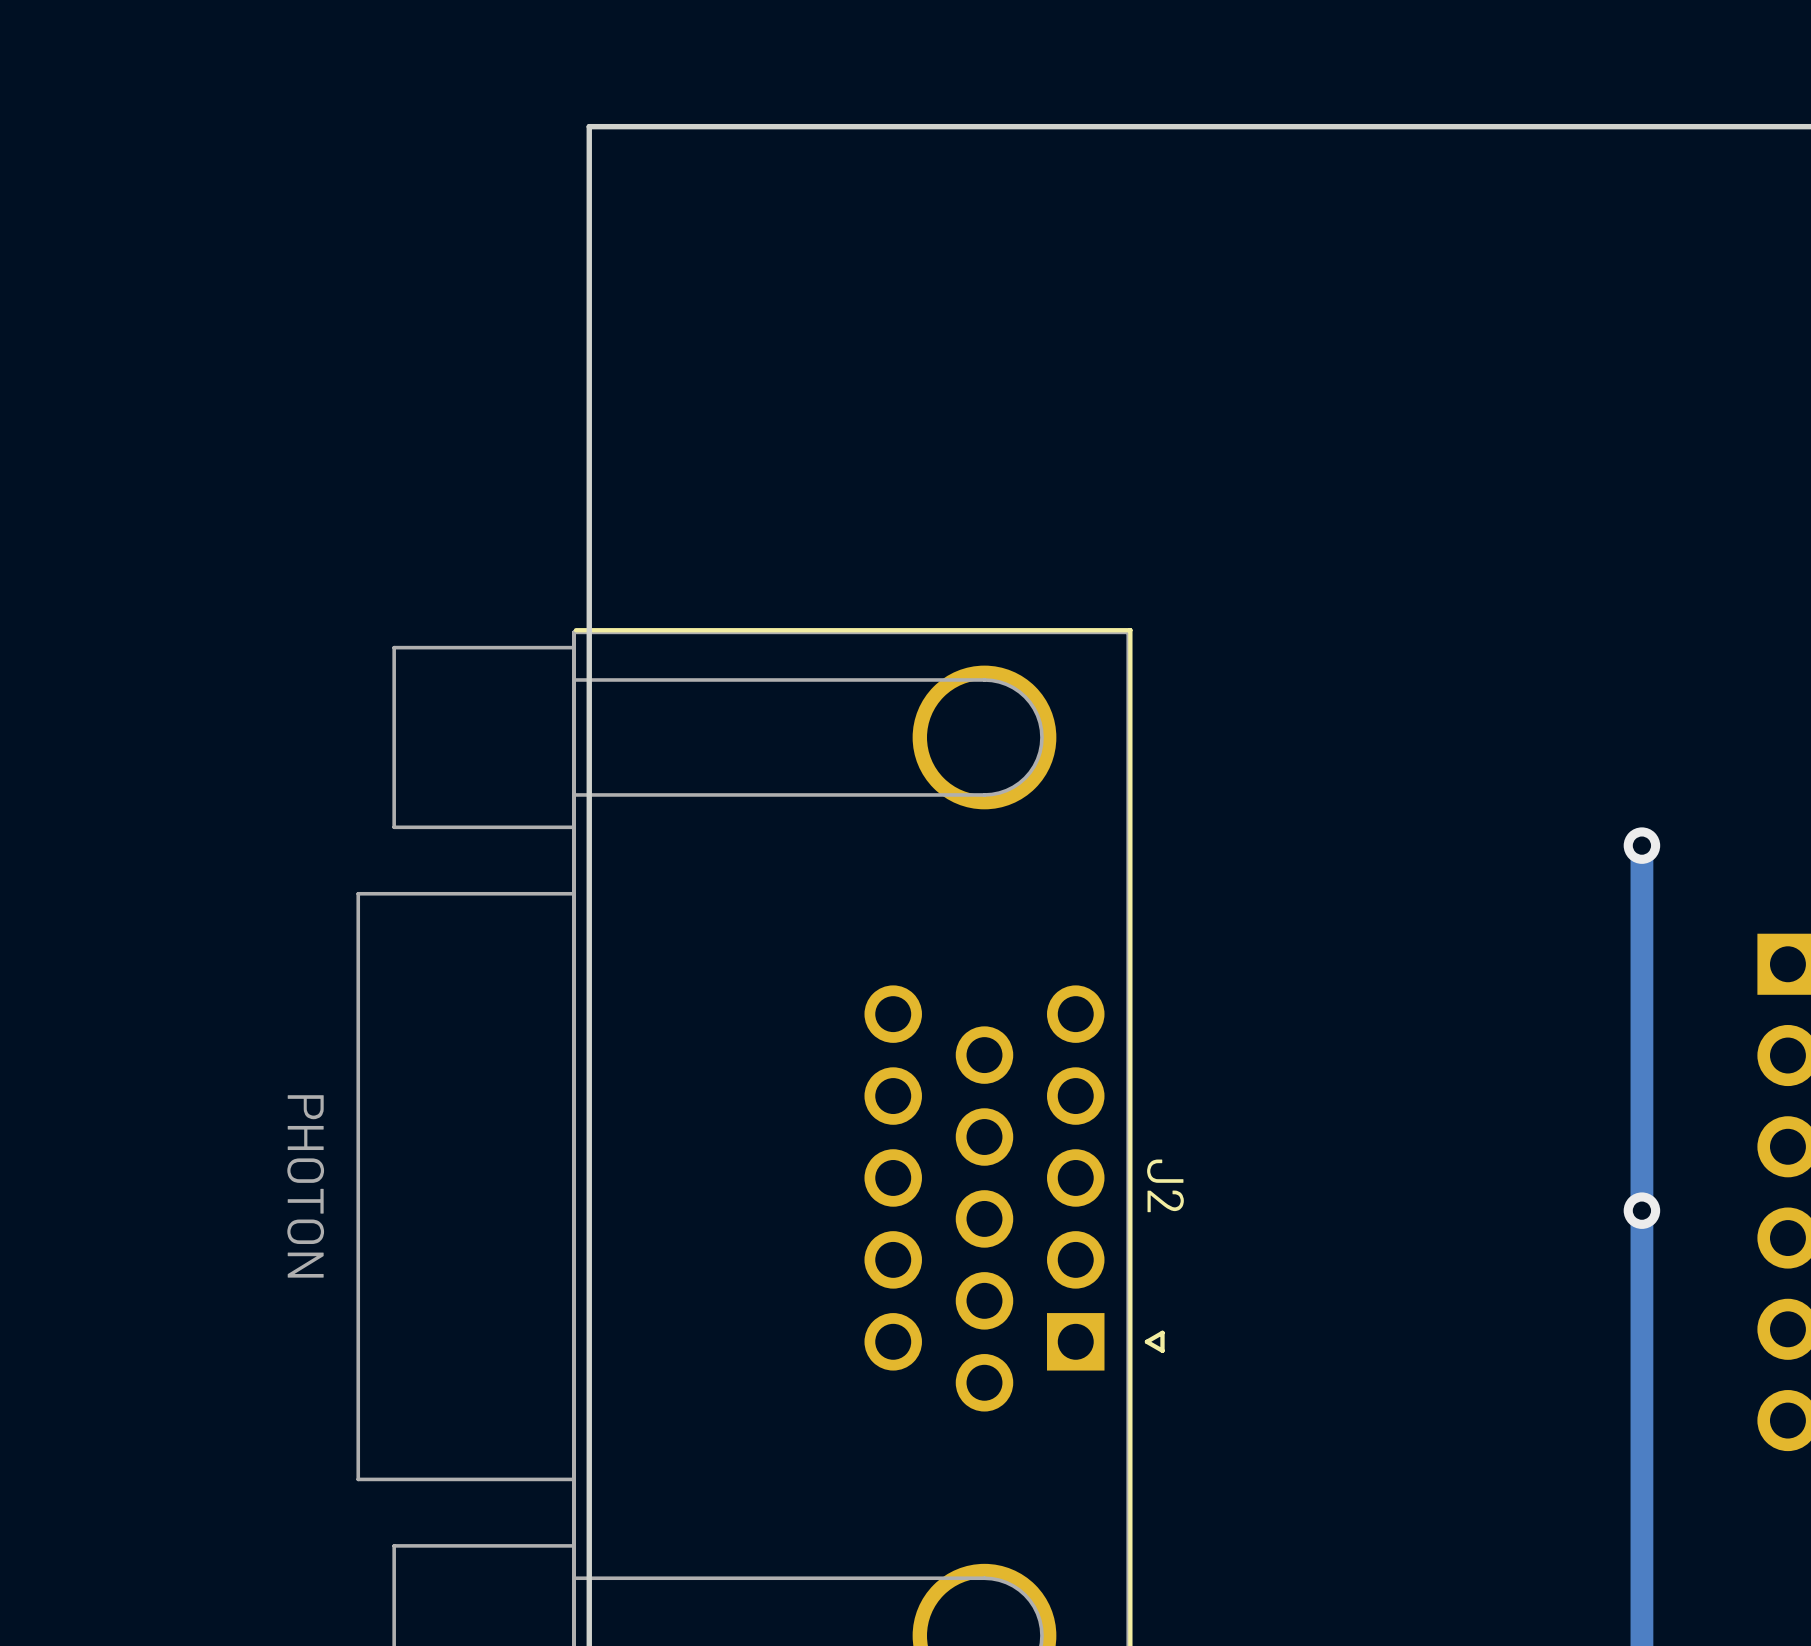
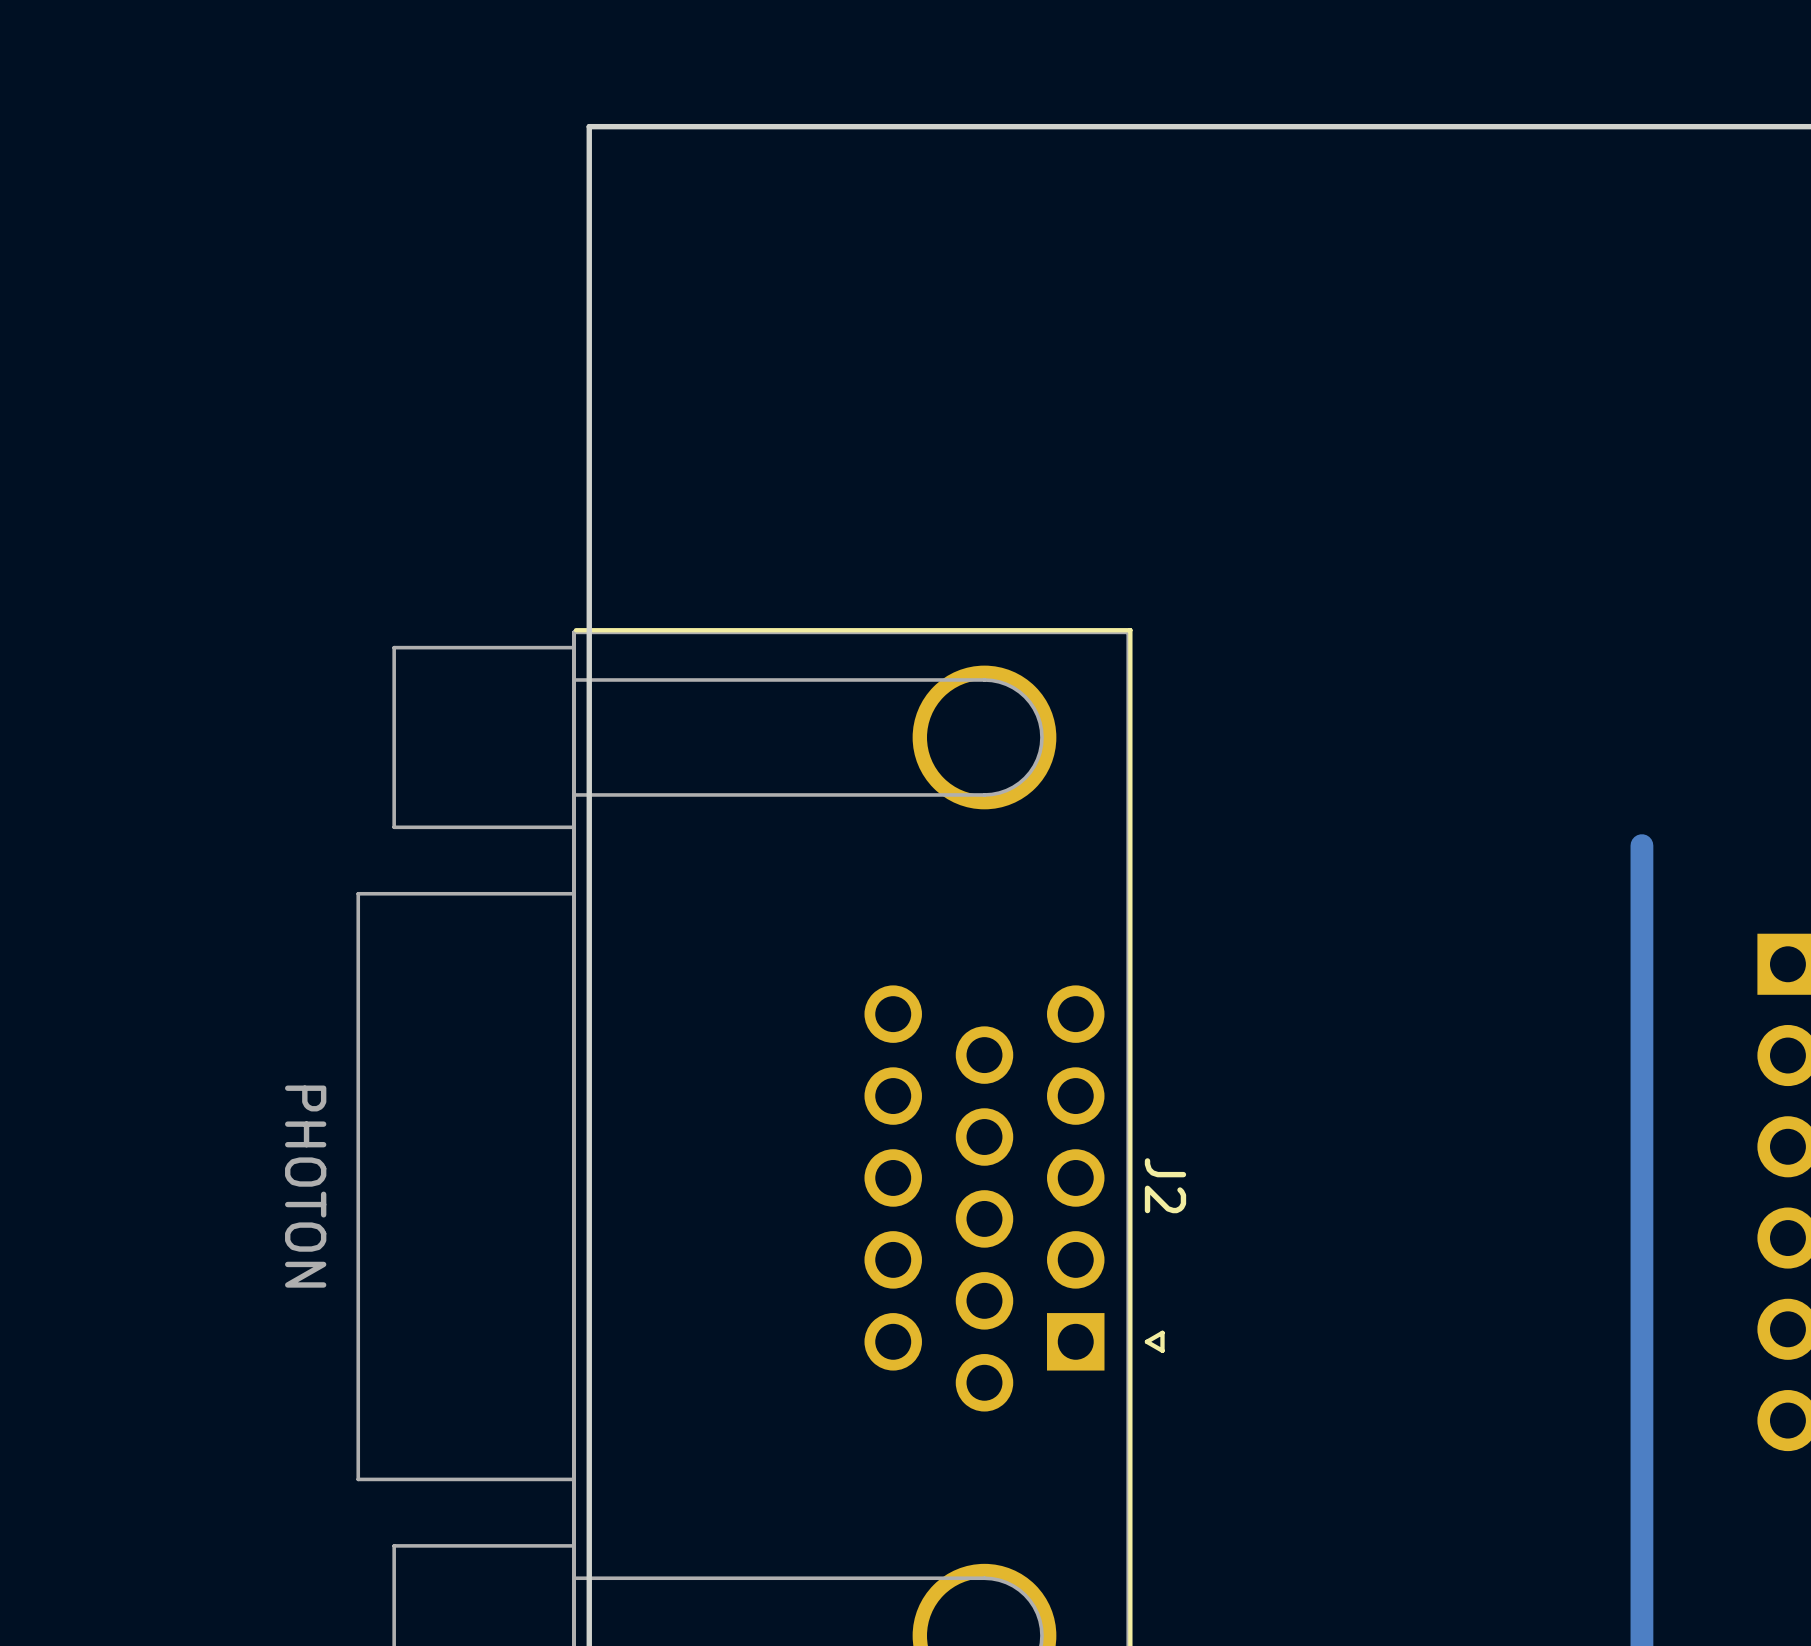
via: (1641, 845) -> none
via: (1641, 1210) -> none

